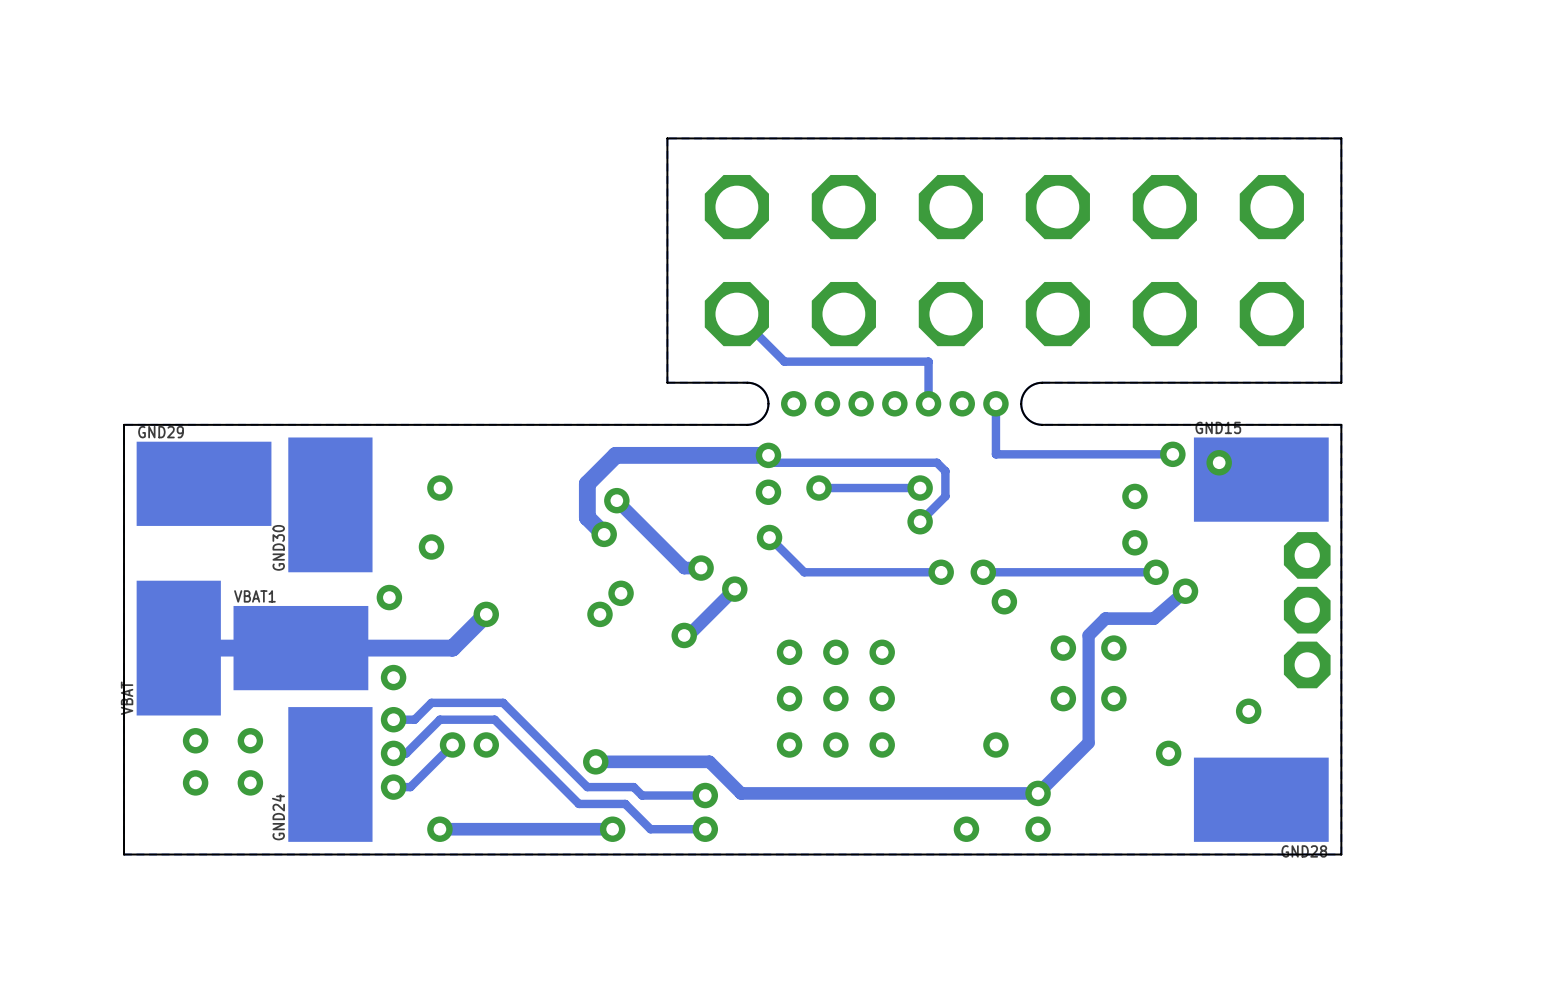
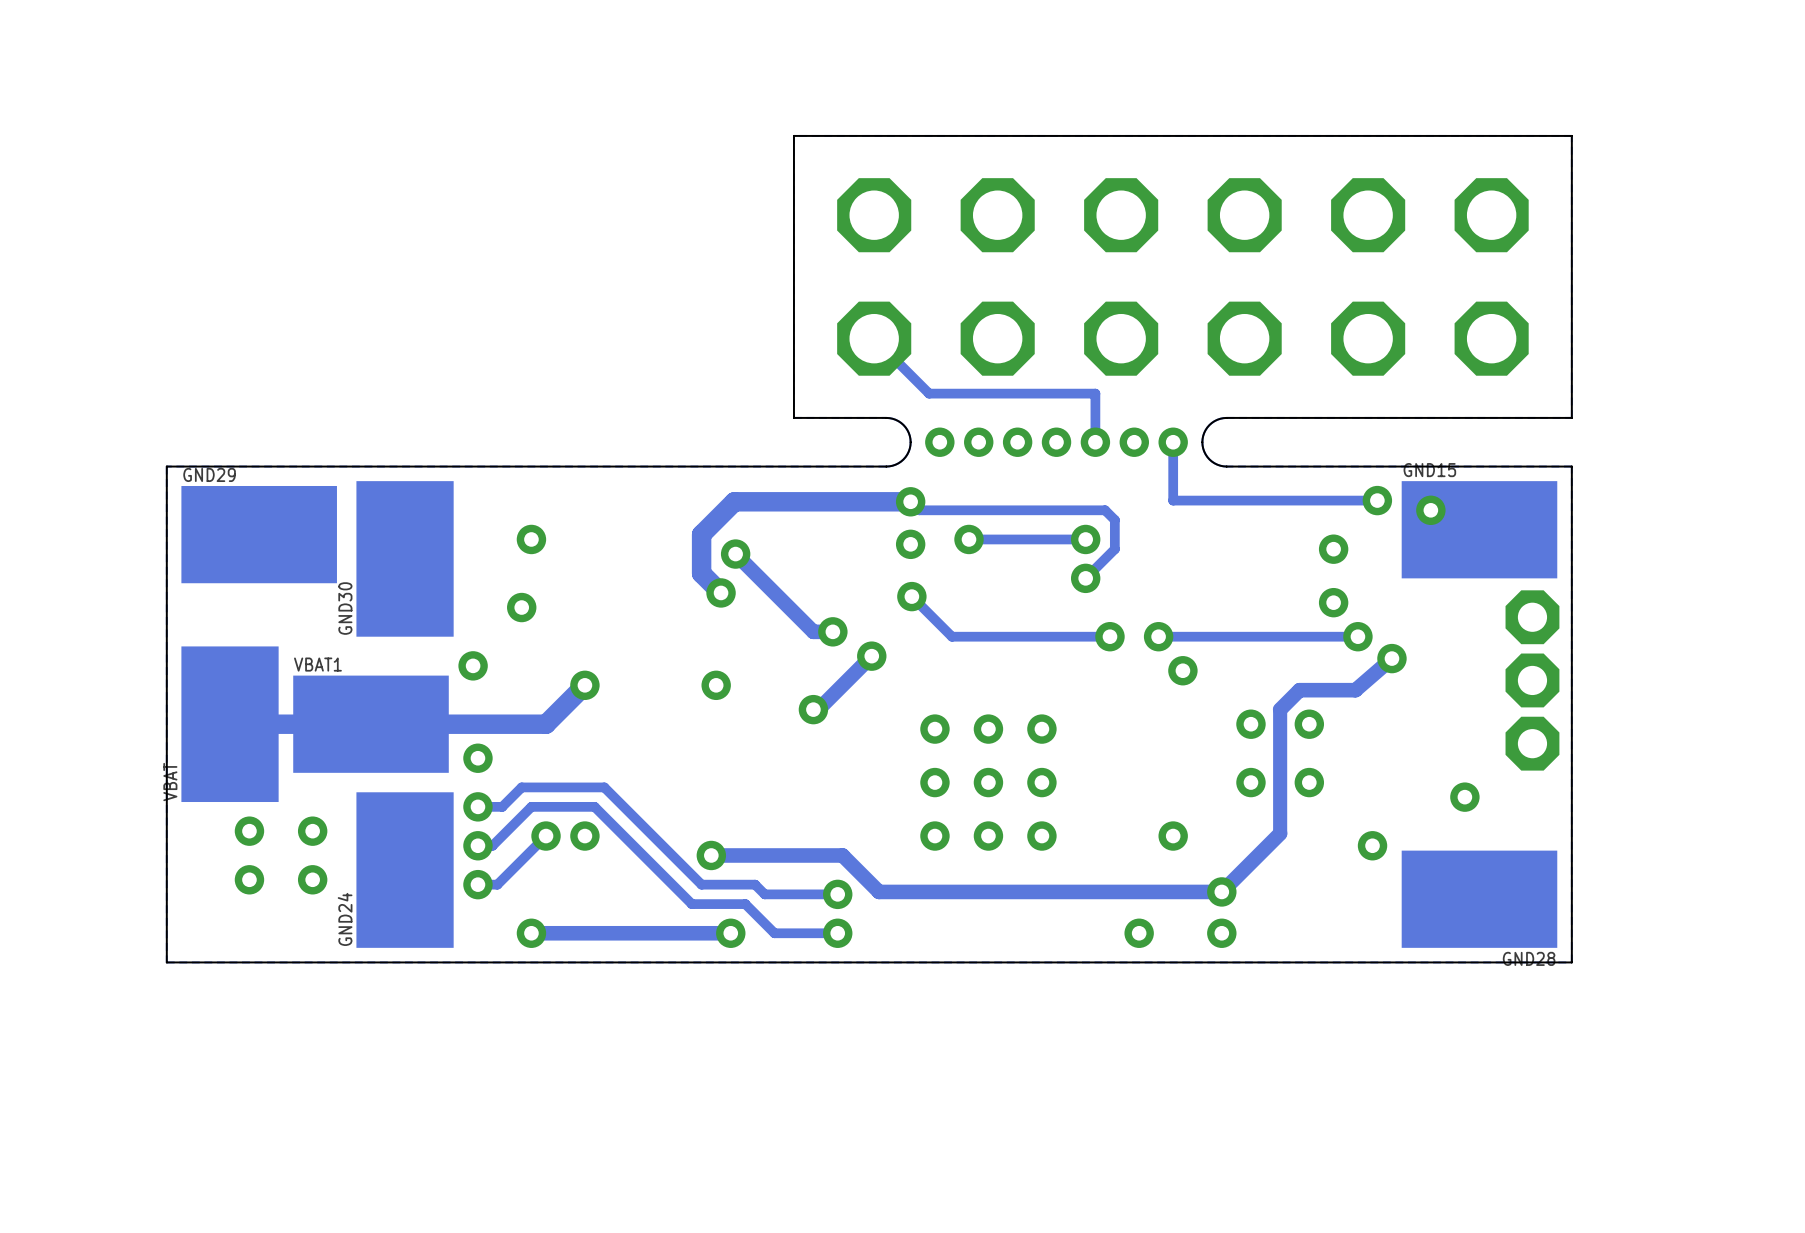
via: (621, 593) -> none

